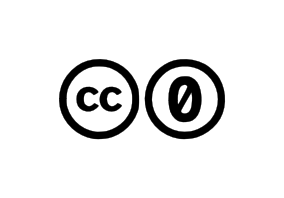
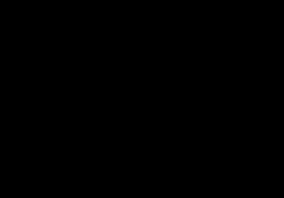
drawing: [59, 59, 226, 140] -> none

